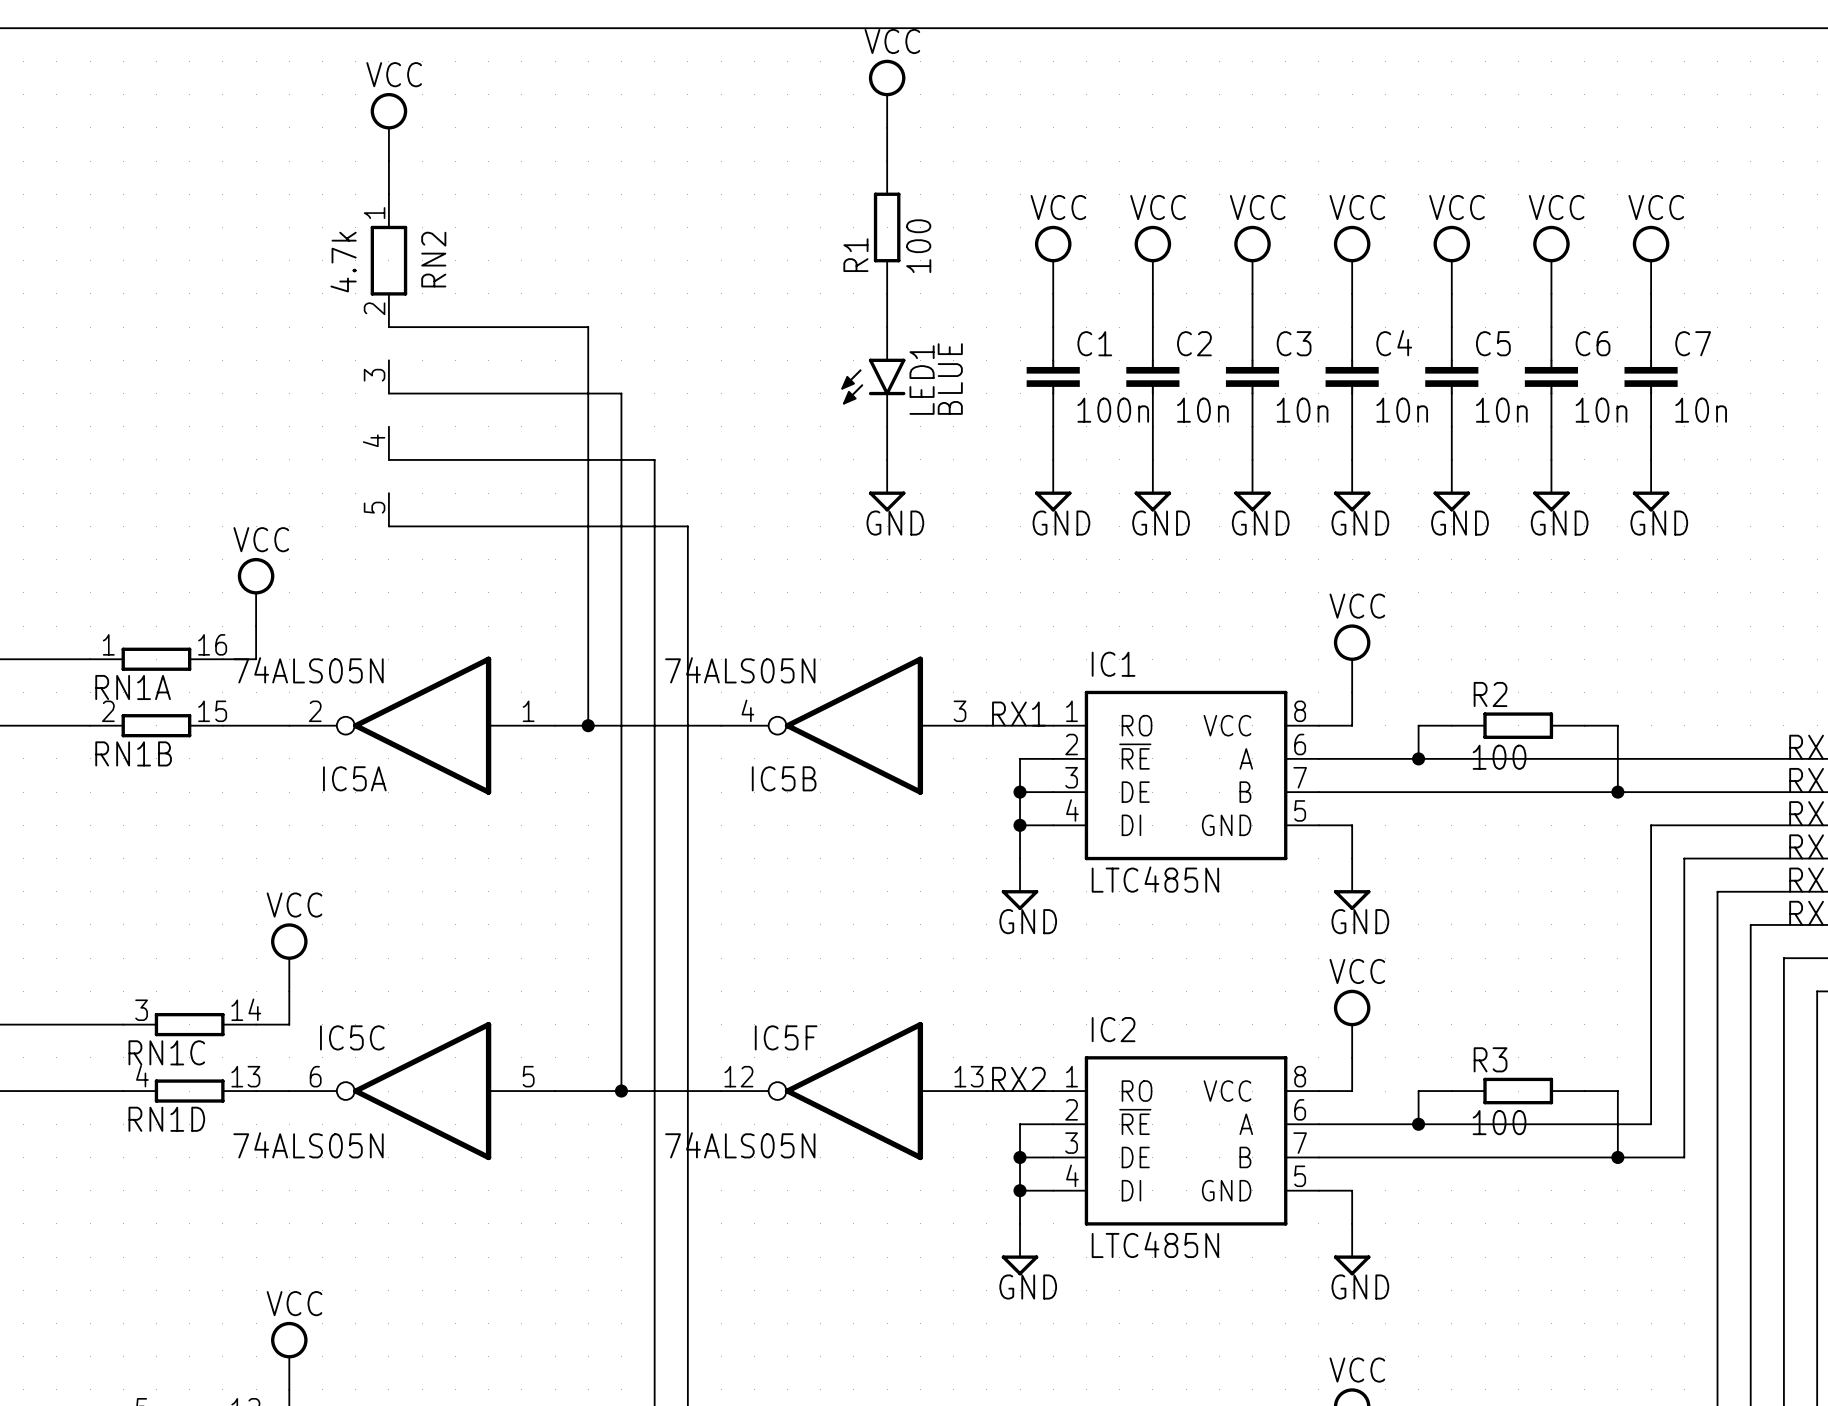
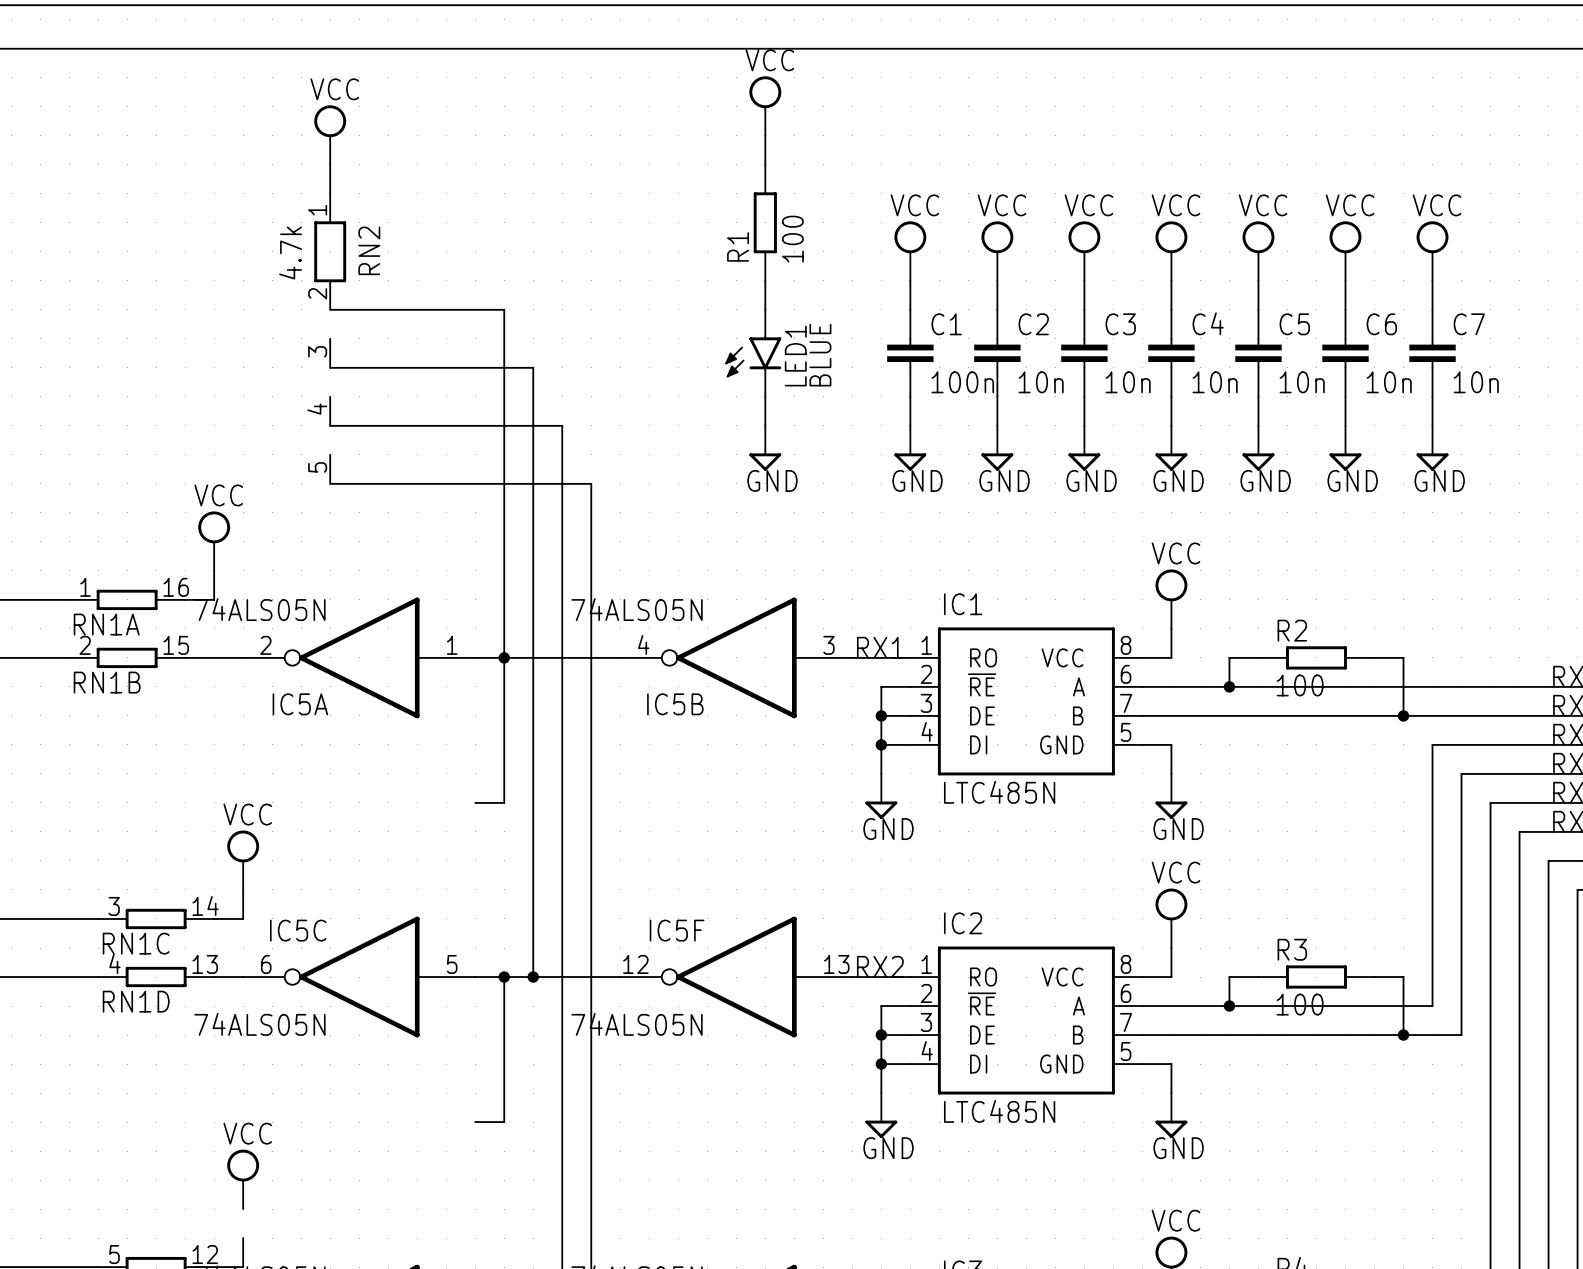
wire: none -> (504, 657) (504, 802) (475, 802)
wire: none -> (504, 977) (504, 1122) (475, 1122)
junction: none -> (504, 977)
power symbol position: VCC (289, 1355) -> VCC (243, 1179)

